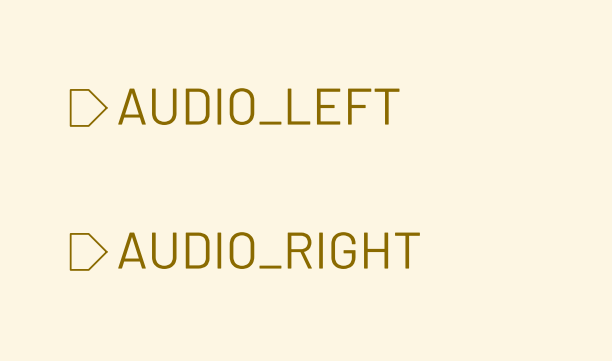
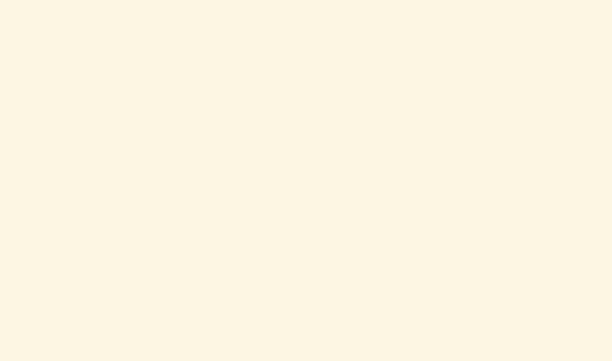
hierarchical label: AUDIO_LEFT (258, 106) -> none
hierarchical label: AUDIO_RIGHT (268, 250) -> none

